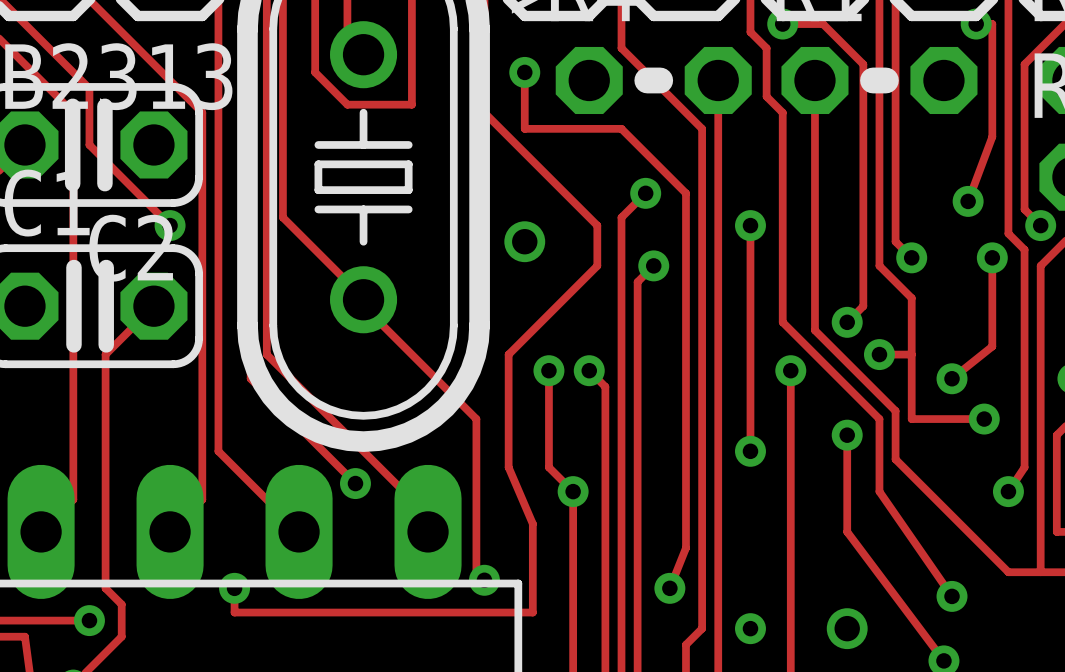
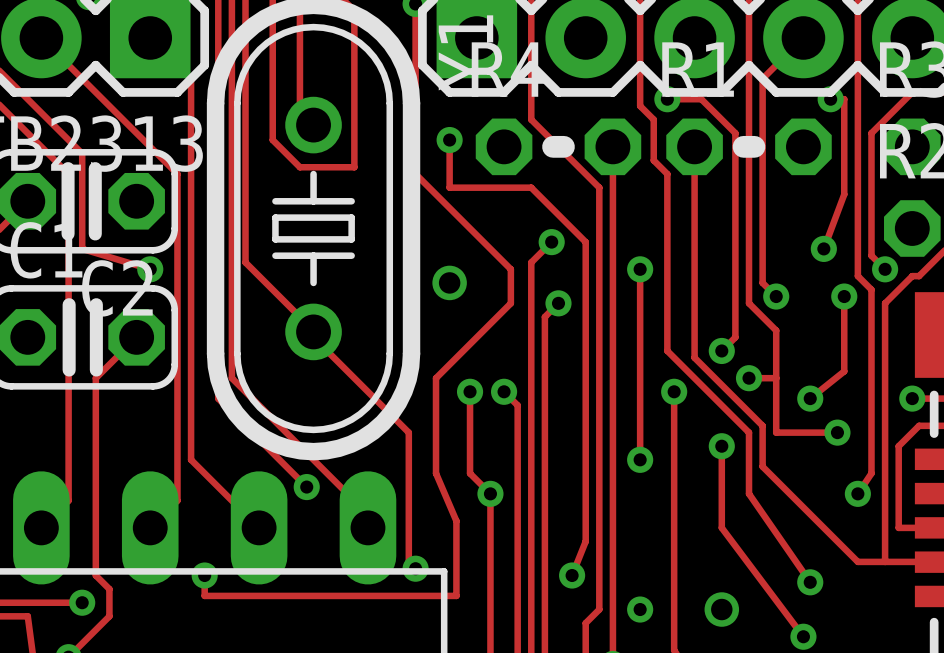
track: (89, 144) (170, 225) -> (82, 201) (82, 248) (150, 269)

